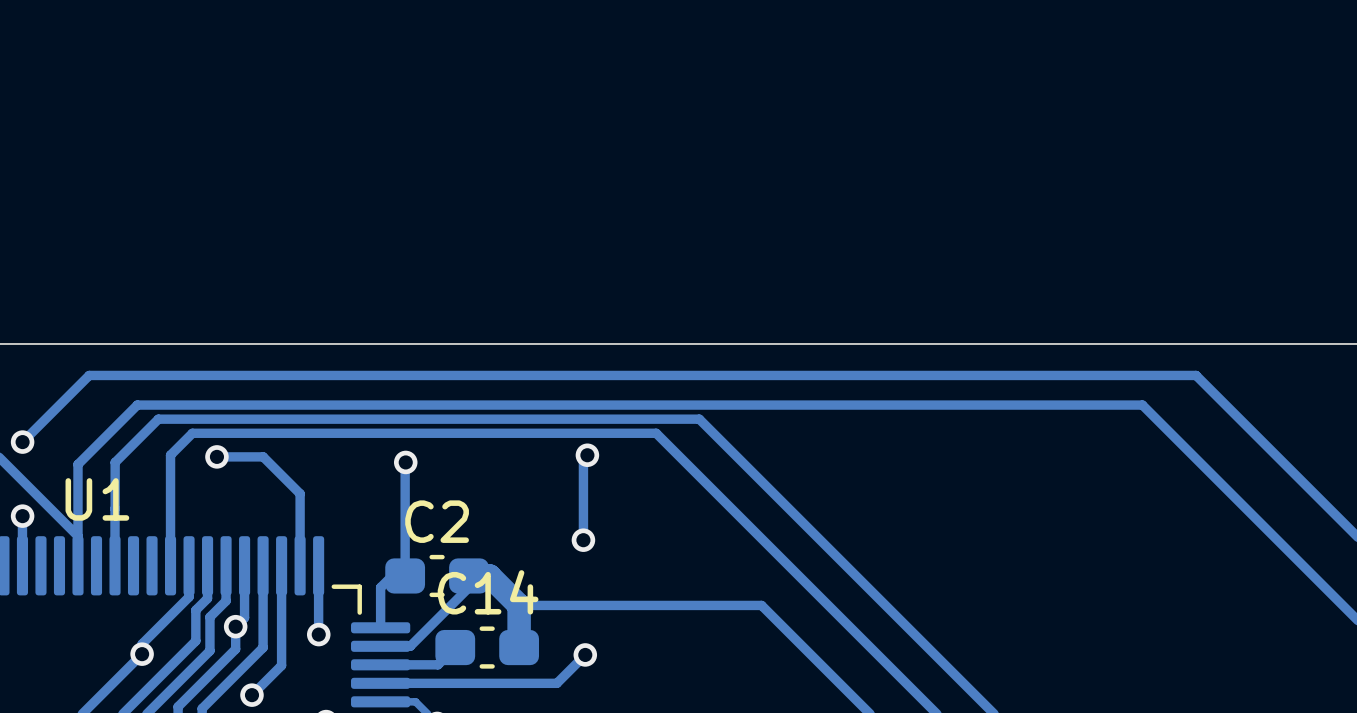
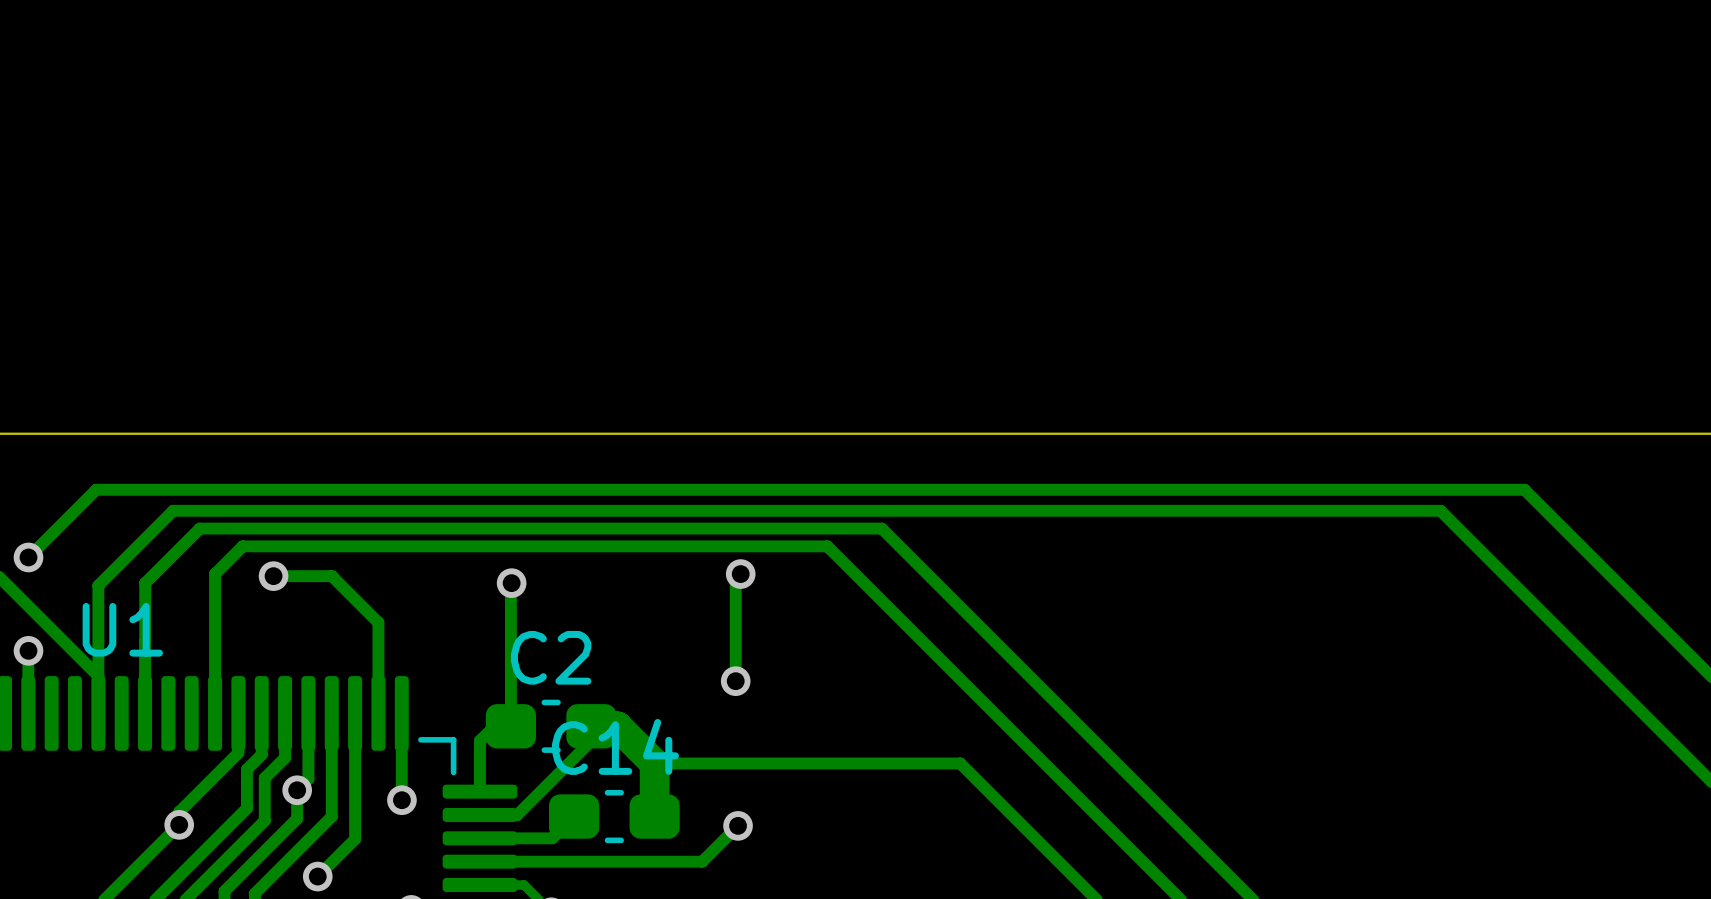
track: (1209, 388) (1196, 375) (89, 375) (76, 388) -> (1524, 489) (96, 489)

